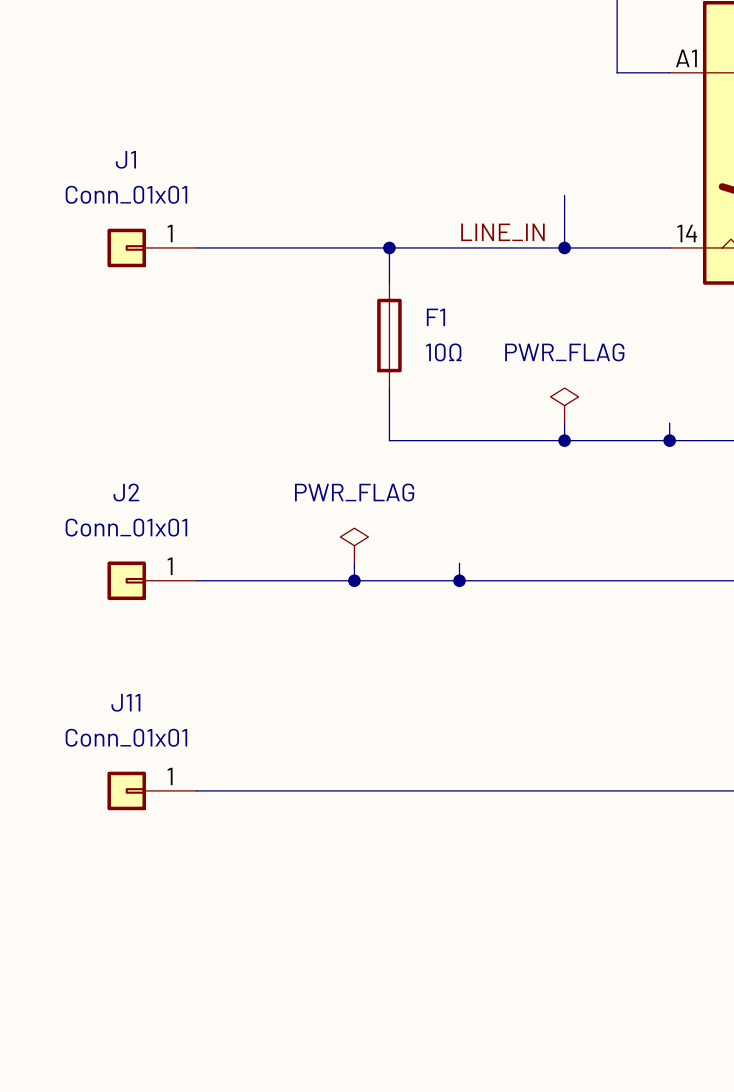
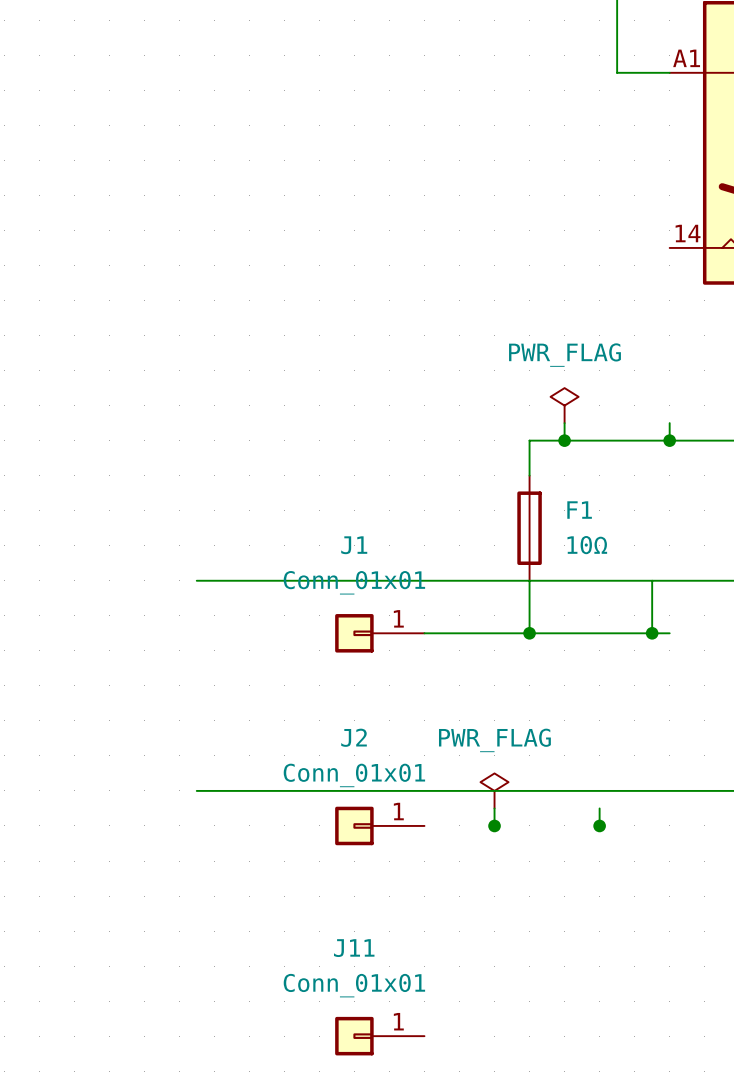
wire: (564, 195) (564, 247) -> none
label: LINE_IN (502, 232) -> none
J1 position: (152, 247) -> (379, 633)
wire: (196, 247) (669, 247) -> none
wire: (389, 247) (389, 283) -> none
junction: (389, 247) -> none
junction: (564, 247) -> none
F1 position: (389, 335) -> (529, 528)
wire: (389, 388) (389, 440) (529, 440) -> (529, 475) (529, 440)
power symbol position: PWR_FLAG (354, 545) -> PWR_FLAG (494, 790)
wire: (354, 563) (354, 580) -> (494, 808) (494, 825)
wire: (459, 563) (459, 580) -> (599, 808) (599, 825)
J2 position: (152, 580) -> (379, 825)
junction: (354, 580) -> none
junction: (459, 580) -> none
wire: none -> (529, 580) (529, 633)
wire: none -> (652, 580) (652, 633)
wire: none -> (424, 633) (669, 633)
junction: none -> (529, 633)
junction: none -> (652, 633)
J11 position: (152, 790) -> (379, 1036)
junction: none -> (494, 825)
junction: none -> (599, 825)

